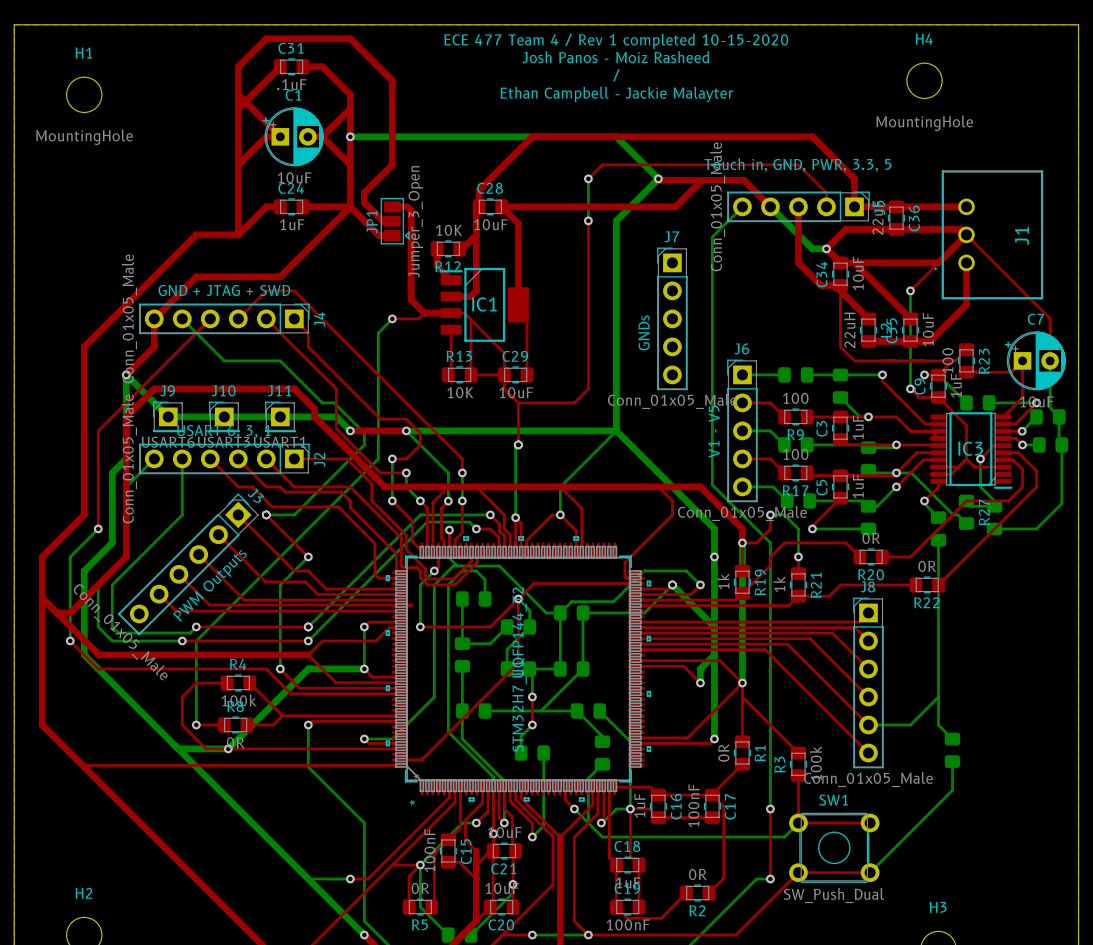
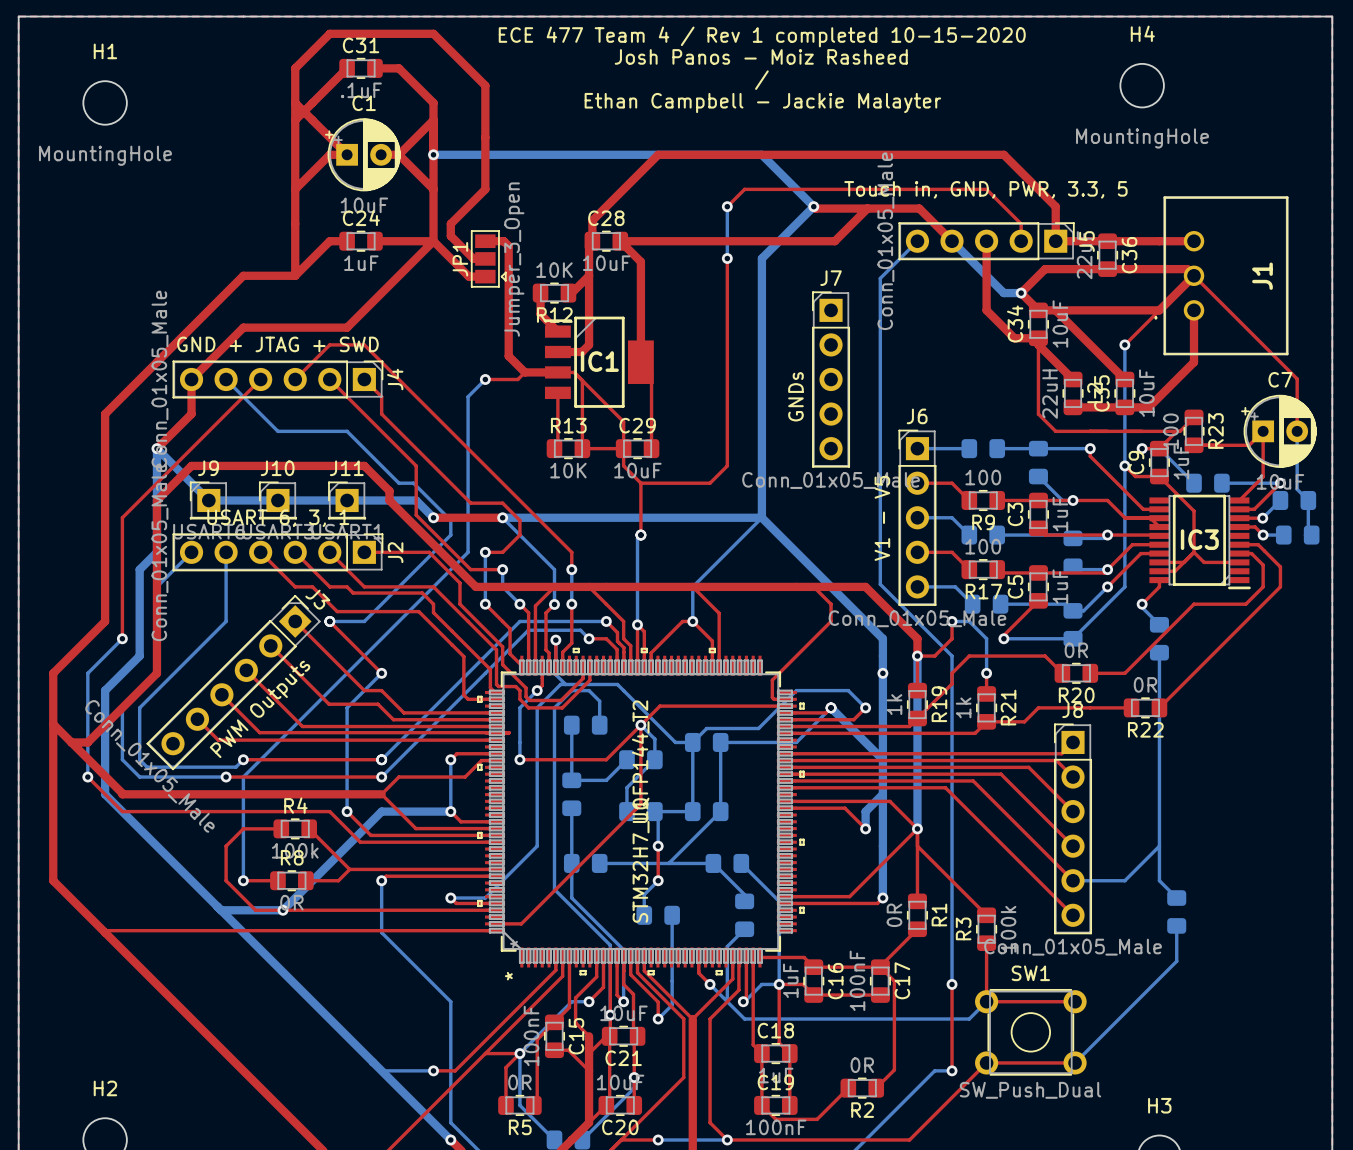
bottom track: none -> (1124, 465) (1124, 586) (1073, 638)
bottom track: (1061, 444) (1061, 503) (1036, 528) (994, 528) -> none
top track: (1003, 445) (993, 445) (980, 458) -> none
bottom track: (980, 458) (980, 486) (994, 500) (994, 506) (971, 506) (966, 500) -> none
via: (980, 458) -> none
bottom track: (896, 472) (911, 472) (953, 514) (957, 514) (966, 523) -> none
R27: (966, 512) -> none
part: (994, 517) -> none

